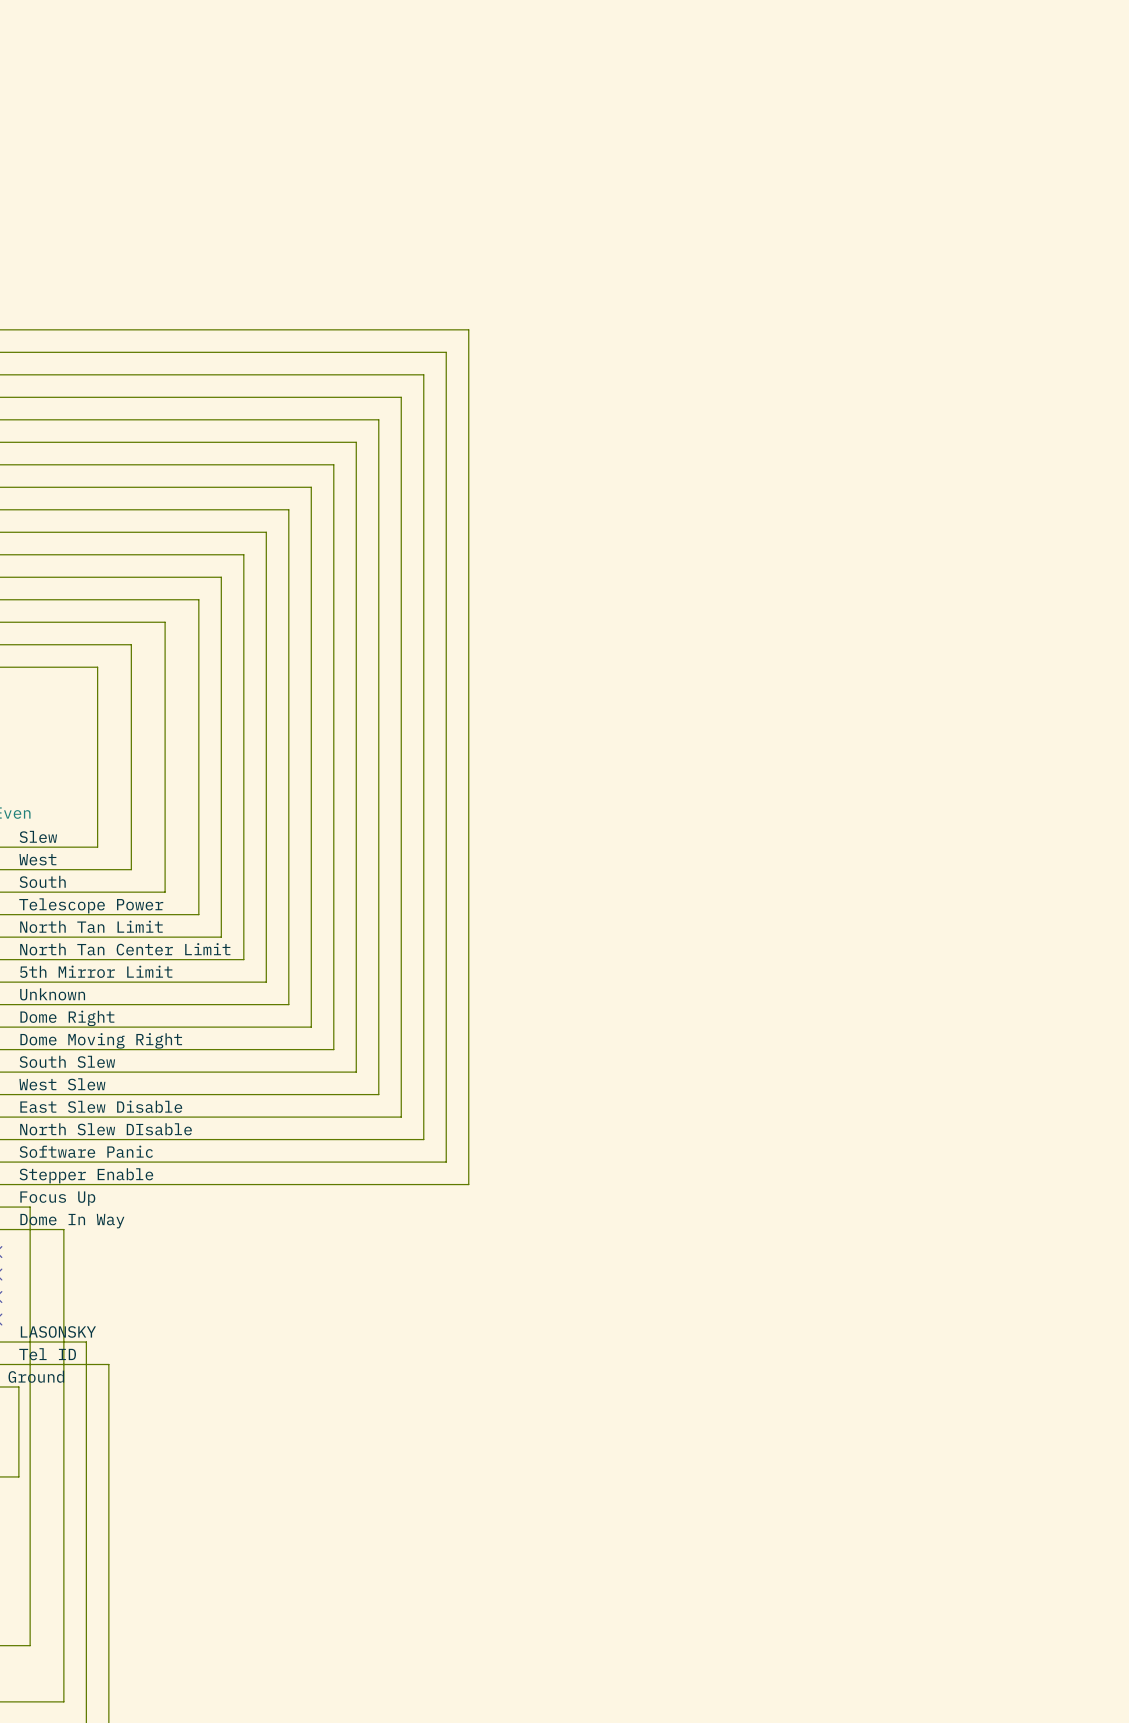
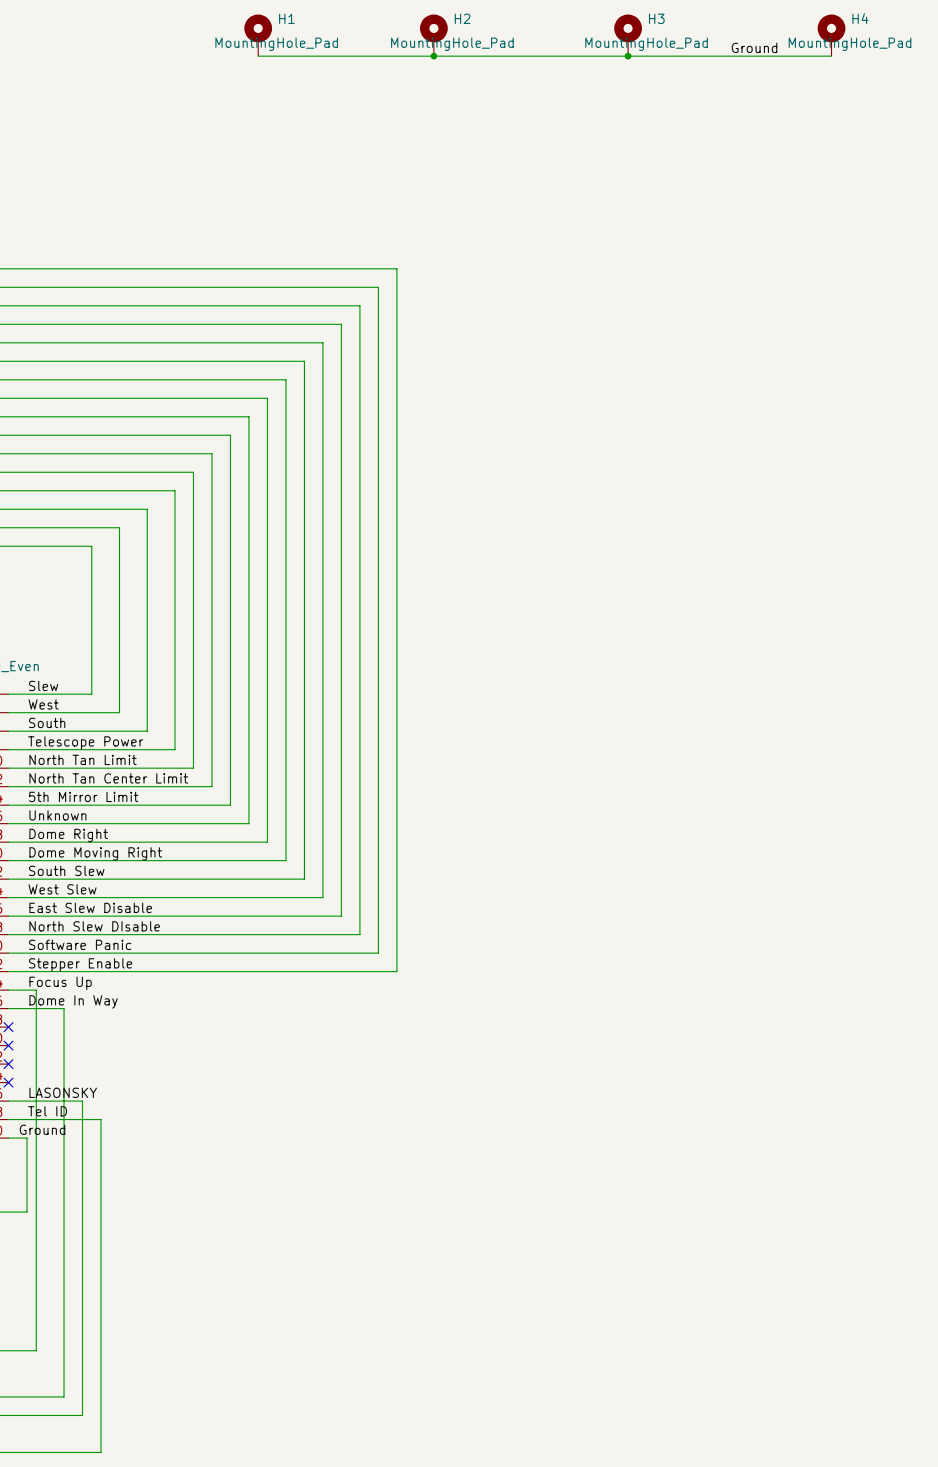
H1: none -> MountingHole_Pad (258, 35)
H2: none -> MountingHole_Pad (433, 35)
H3: none -> MountingHole_Pad (628, 35)
H4: none -> MountingHole_Pad (831, 35)
label: none -> Ground (754, 47)
wire: none -> (258, 56) (831, 56)
junction: none -> (433, 56)
junction: none -> (628, 56)

